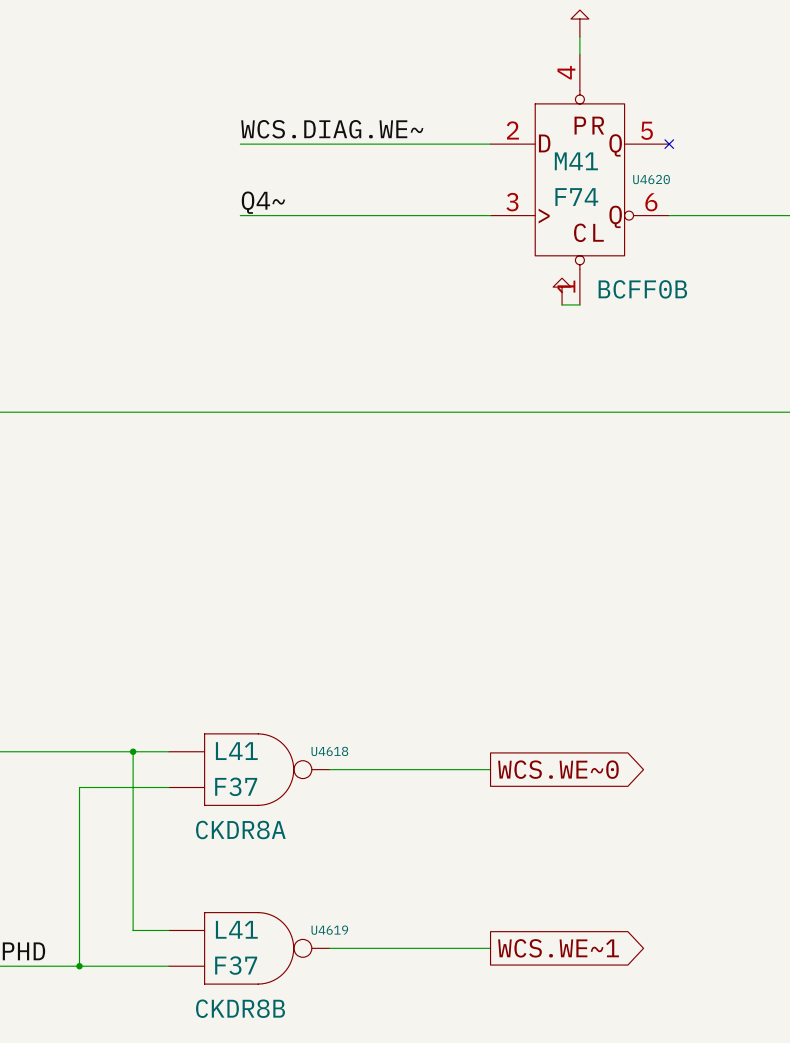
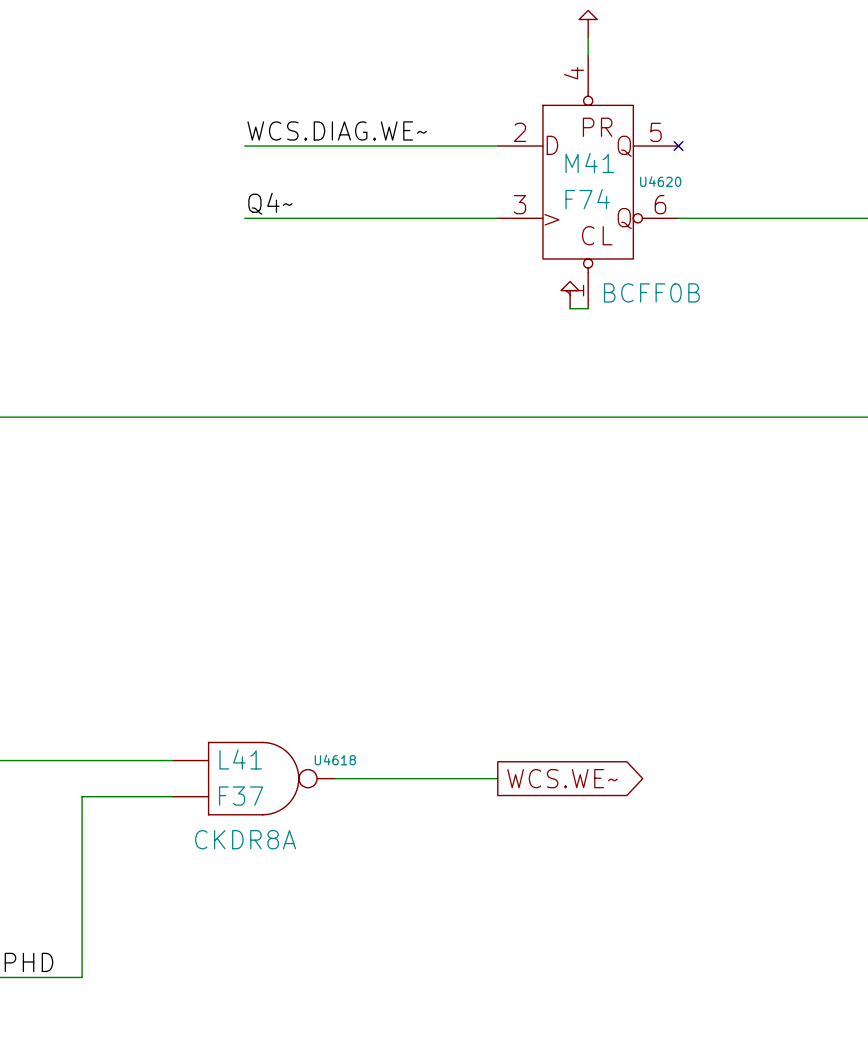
wire: (133, 751) (133, 930) (168, 930) -> none
junction: (133, 751) -> none
global label: WCS.WE~0 (558, 769) -> WCS.WE~ (562, 778)
U4619: F37 (249, 948) -> none
wire: (329, 948) (490, 948) -> none
global label: WCS.WE~1 (558, 948) -> none
wire: (79, 966) (168, 966) -> none
junction: (79, 966) -> none

